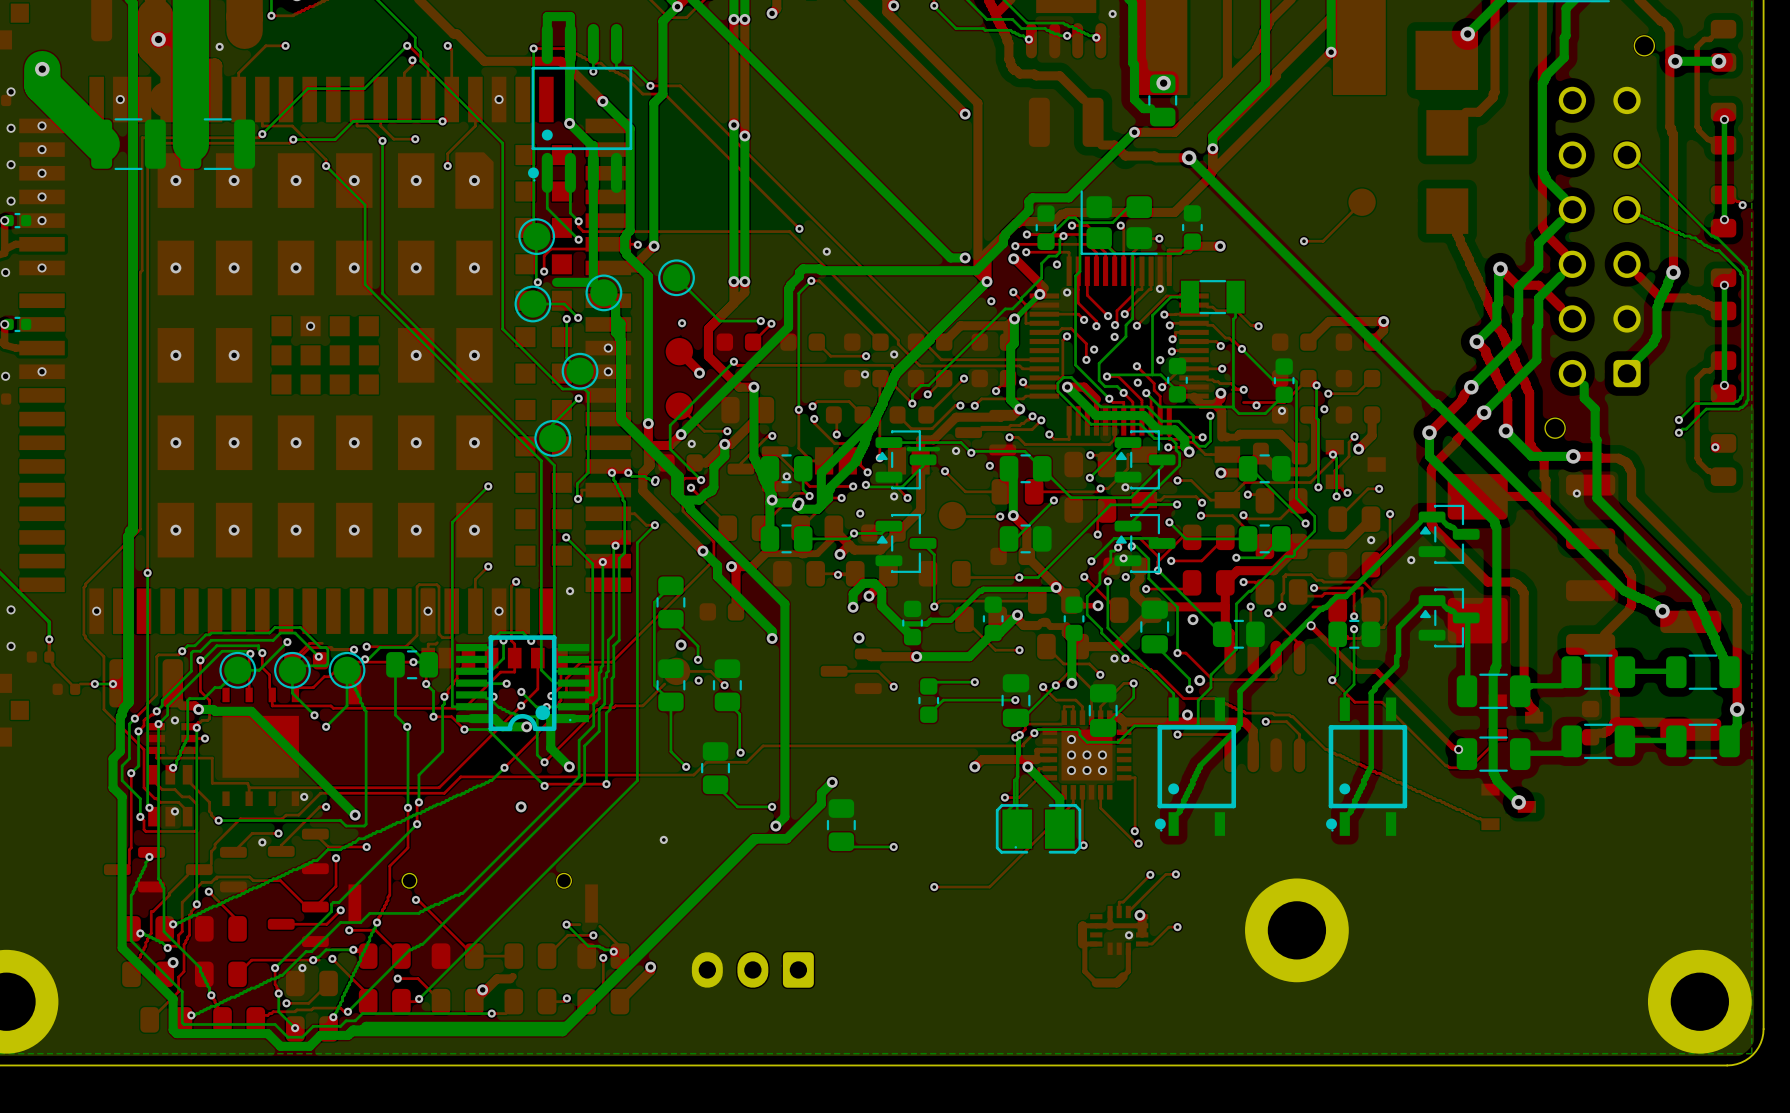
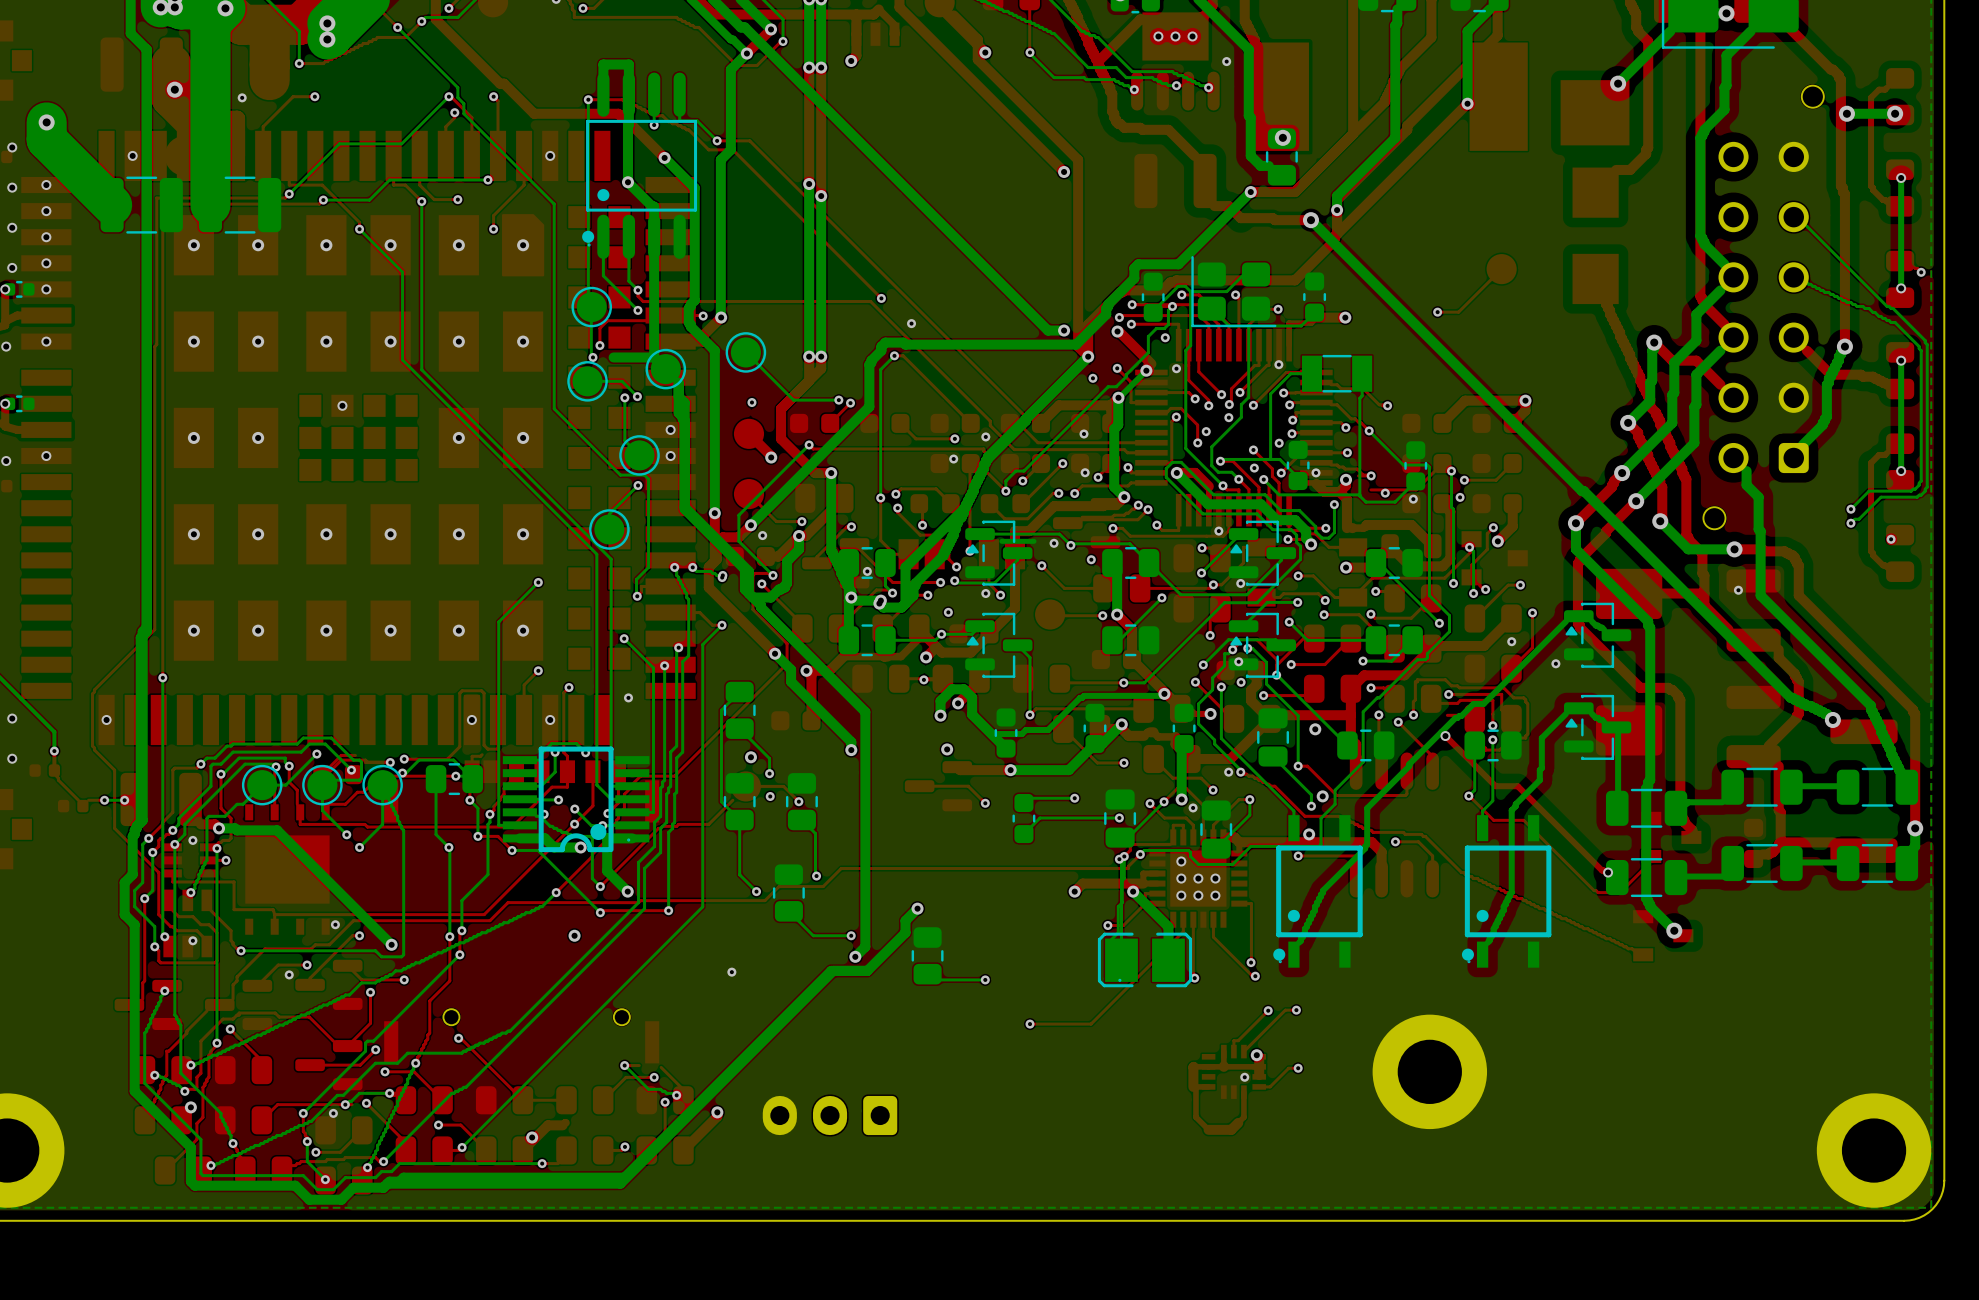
via: none -> (1083, 433)
via: none -> (1085, 472)
via: none -> (1316, 472)
via: none -> (1218, 531)
via: none -> (1193, 807)

